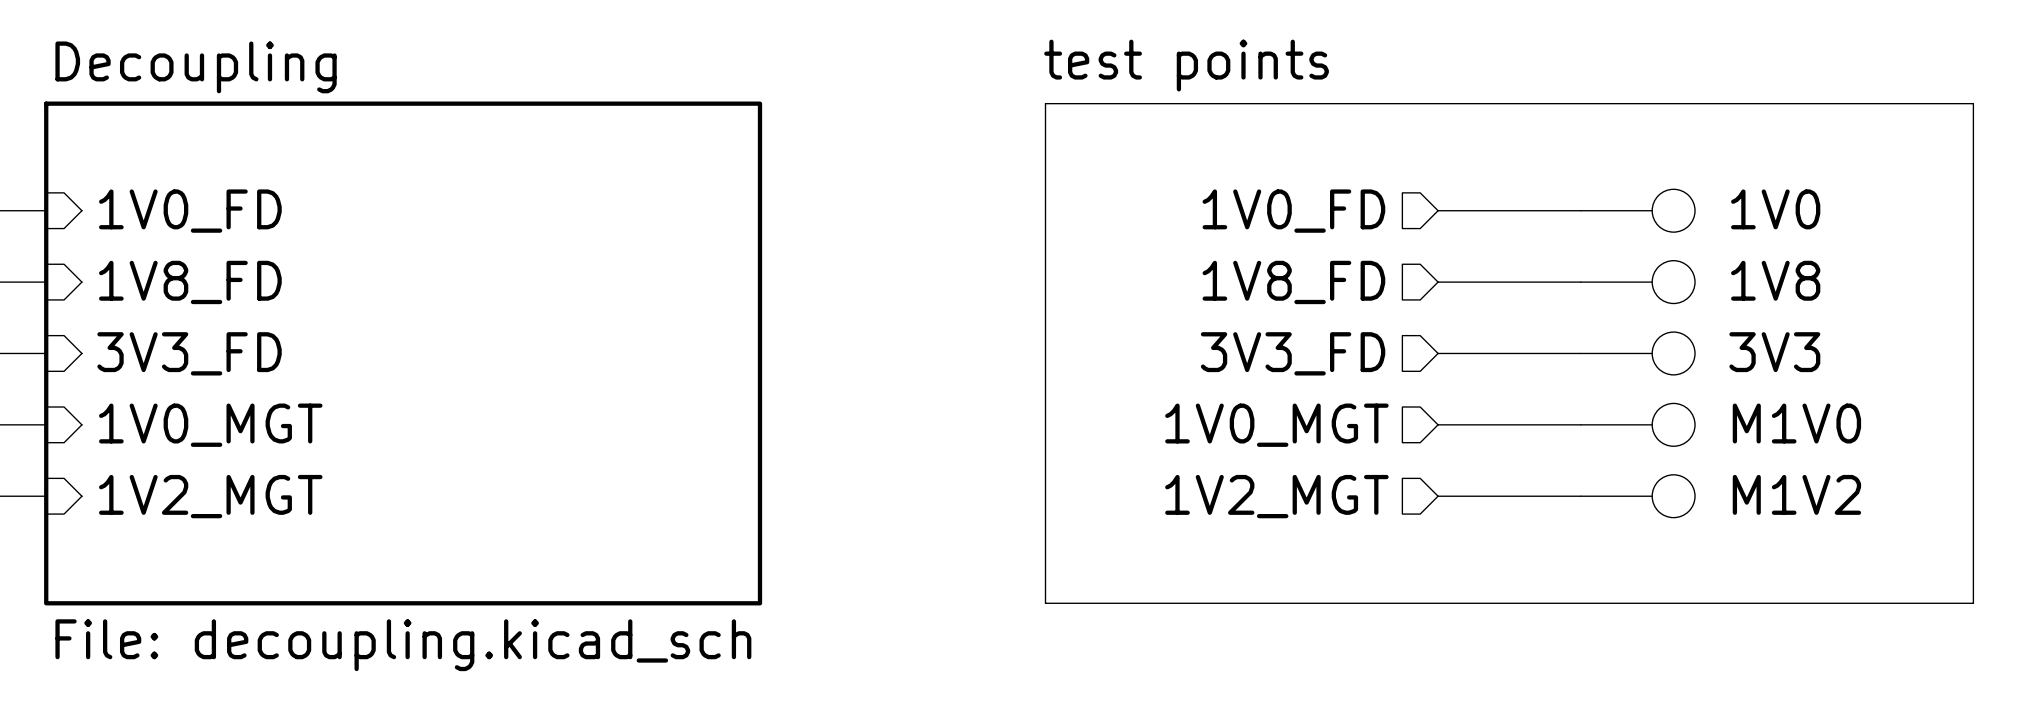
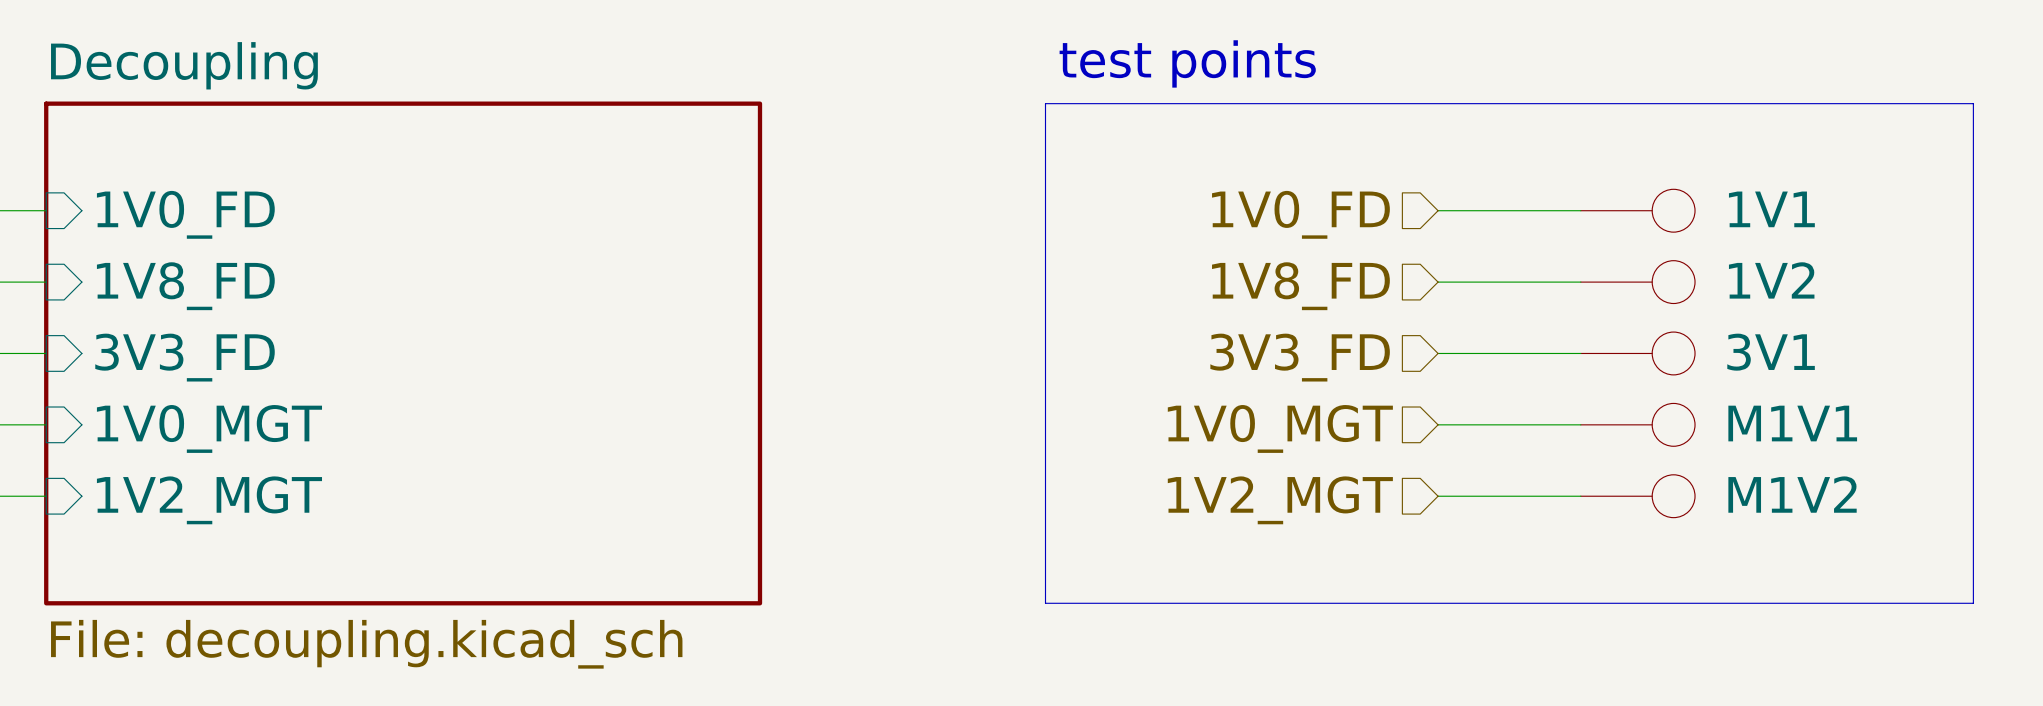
1V0 name: 1V0 (1775, 209) -> 1V1 (1771, 209)
1V8 name: 1V8 (1775, 280) -> 1V2 (1771, 280)
3V3 name: 3V3 (1774, 352) -> 3V1 (1771, 352)
M1V0 name: M1V0 (1796, 423) -> M1V1 (1792, 423)

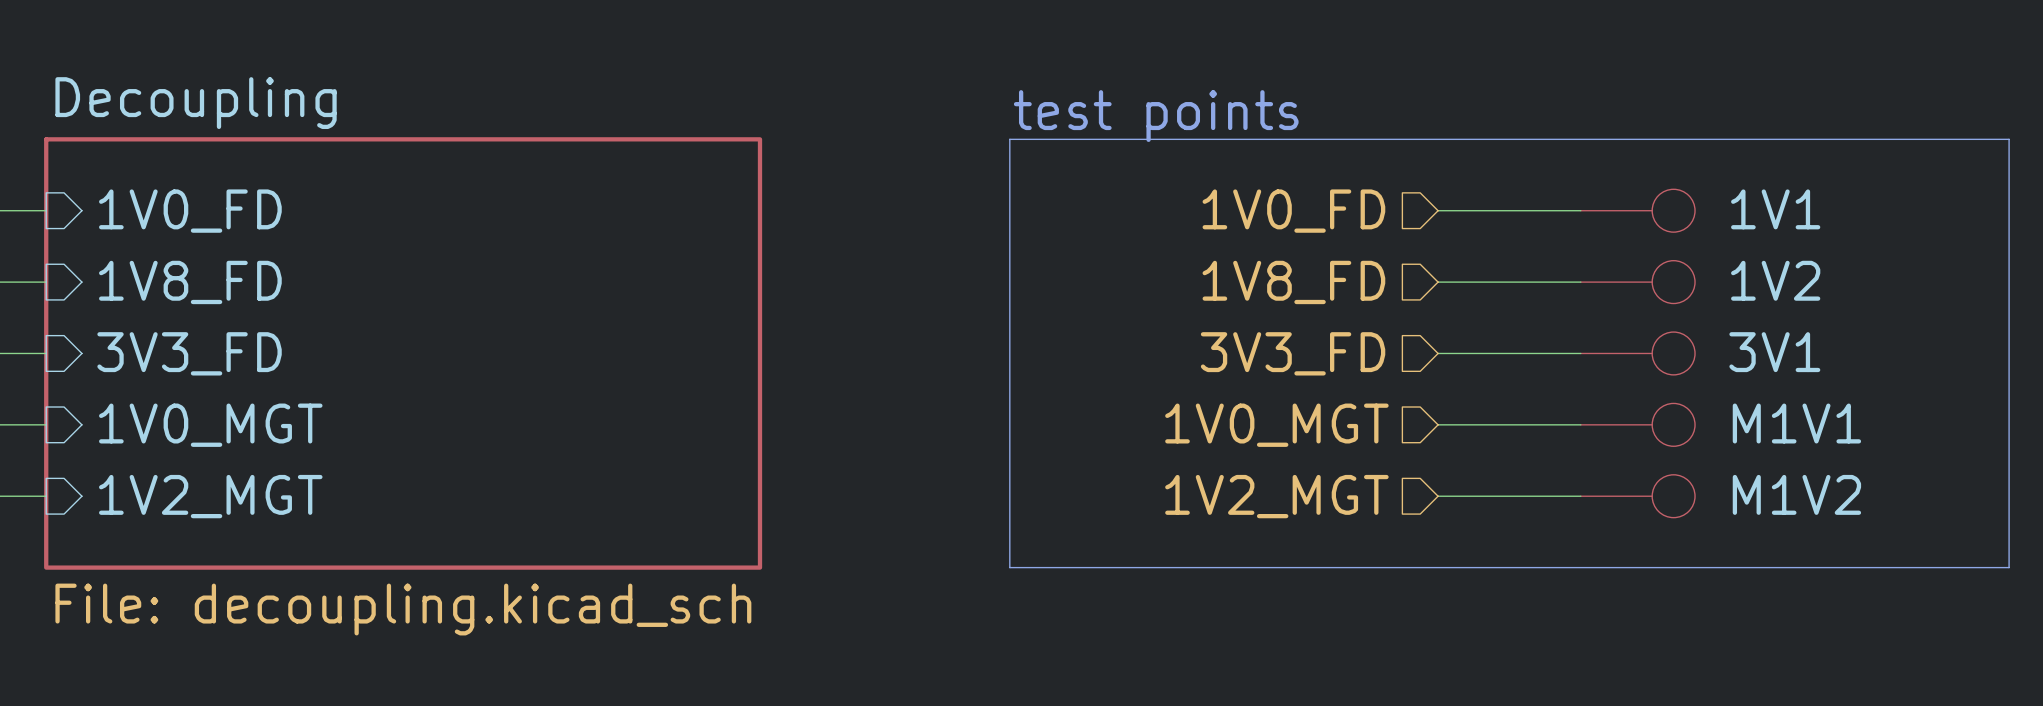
text position: test points (1187, 63) -> test points (1156, 116)
sheet Decoupling shape: [44, 101, 763, 606] -> [44, 137, 763, 570]
line: (1045, 103) (1973, 103) (1973, 603) (1045, 603) (1045, 103) -> (1009, 139) (1009, 567) (2009, 567) (2009, 139) (1009, 139)

